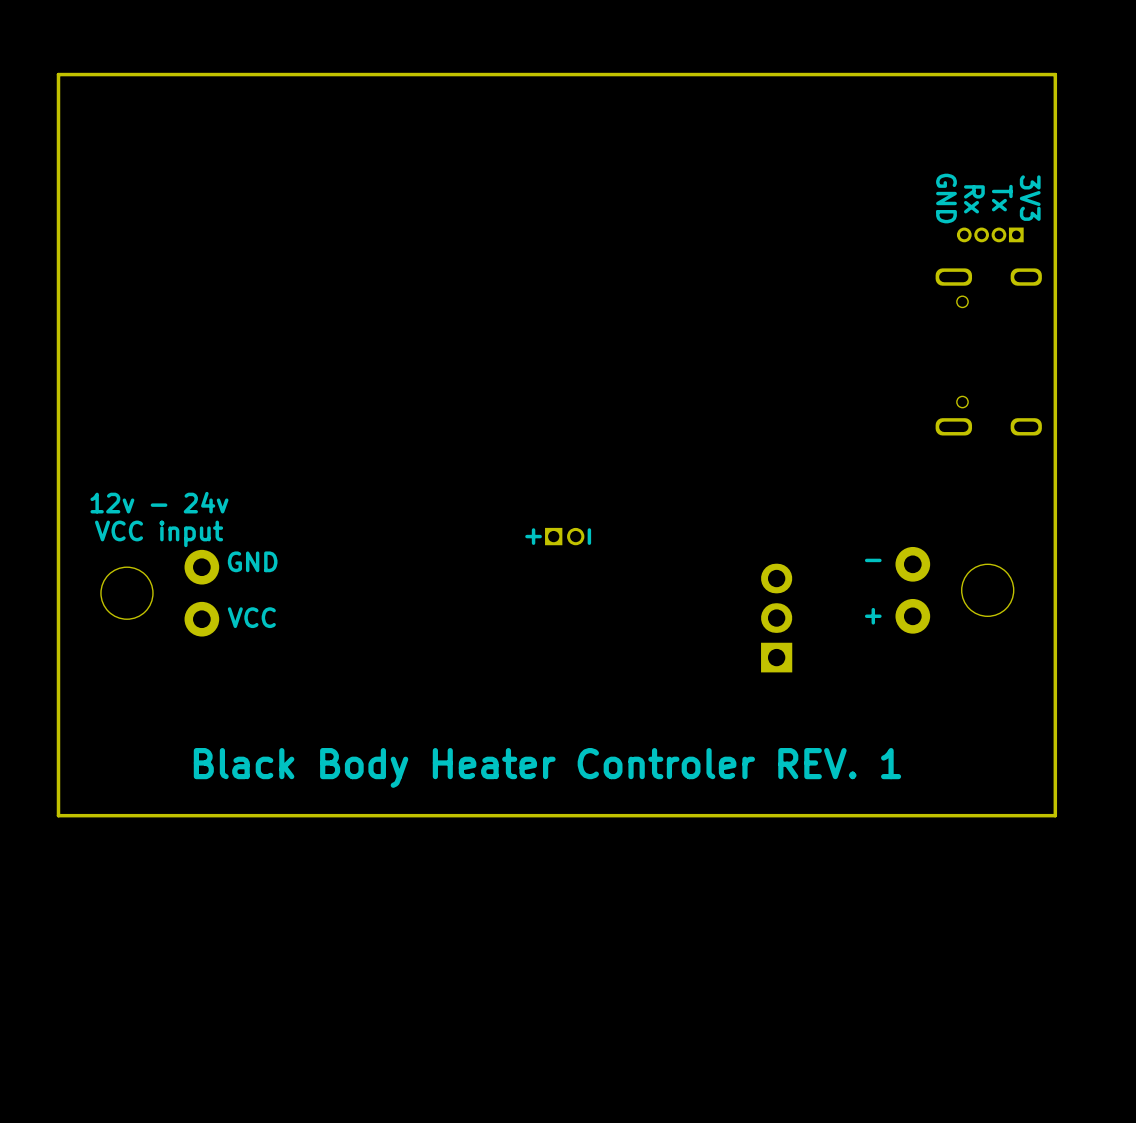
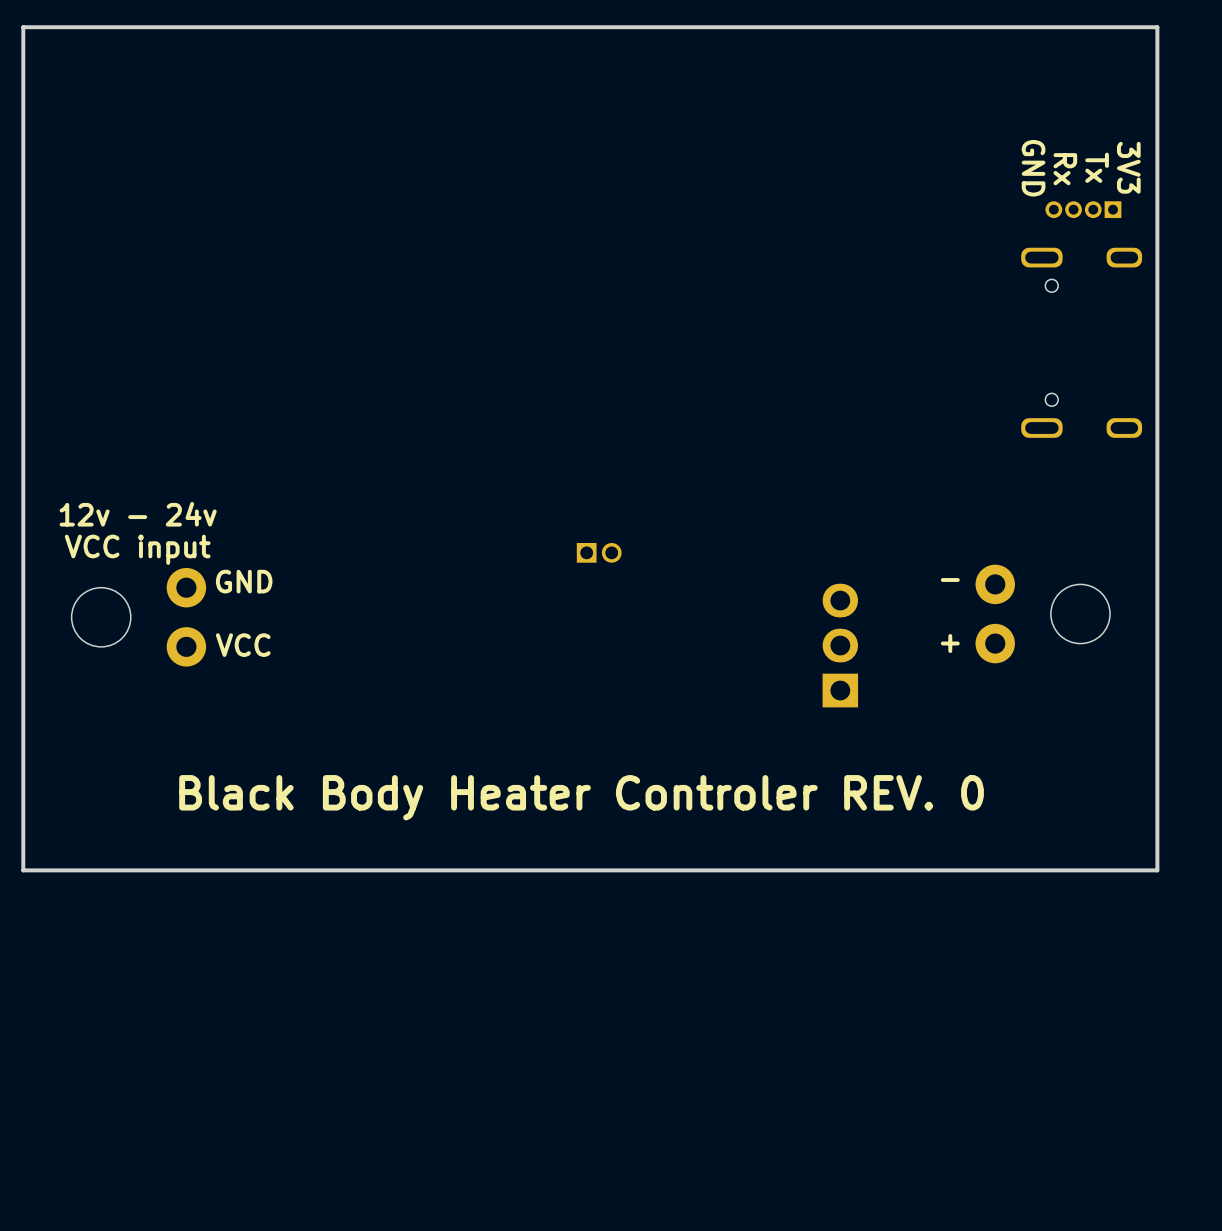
text: + (533, 536) -> none
text: - (589, 536) -> none
text: Black Body Heater Controler REV. 1 (547, 767) -> Black Body Heater Controler REV. 0 (581, 797)

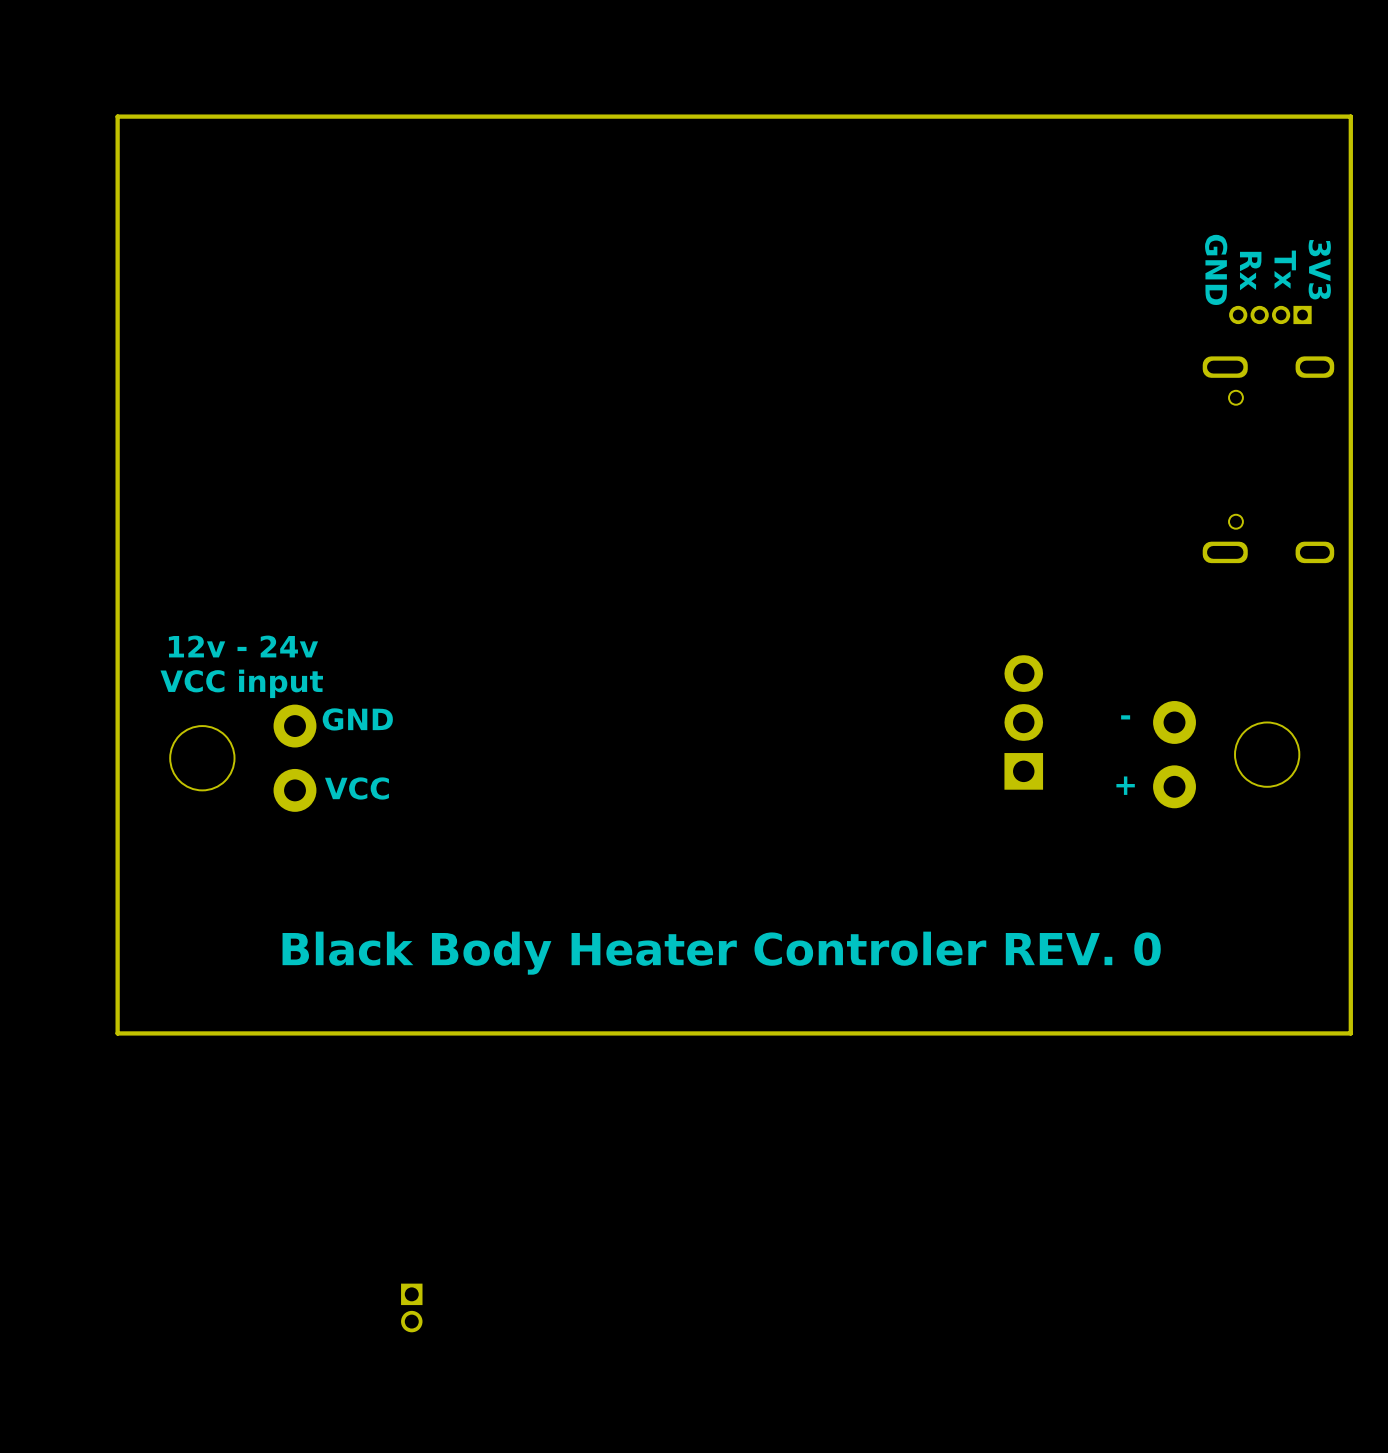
part: (599, 552) -> none
part position: (840, 645) -> (1023, 722)
part: none -> (411, 1307)

